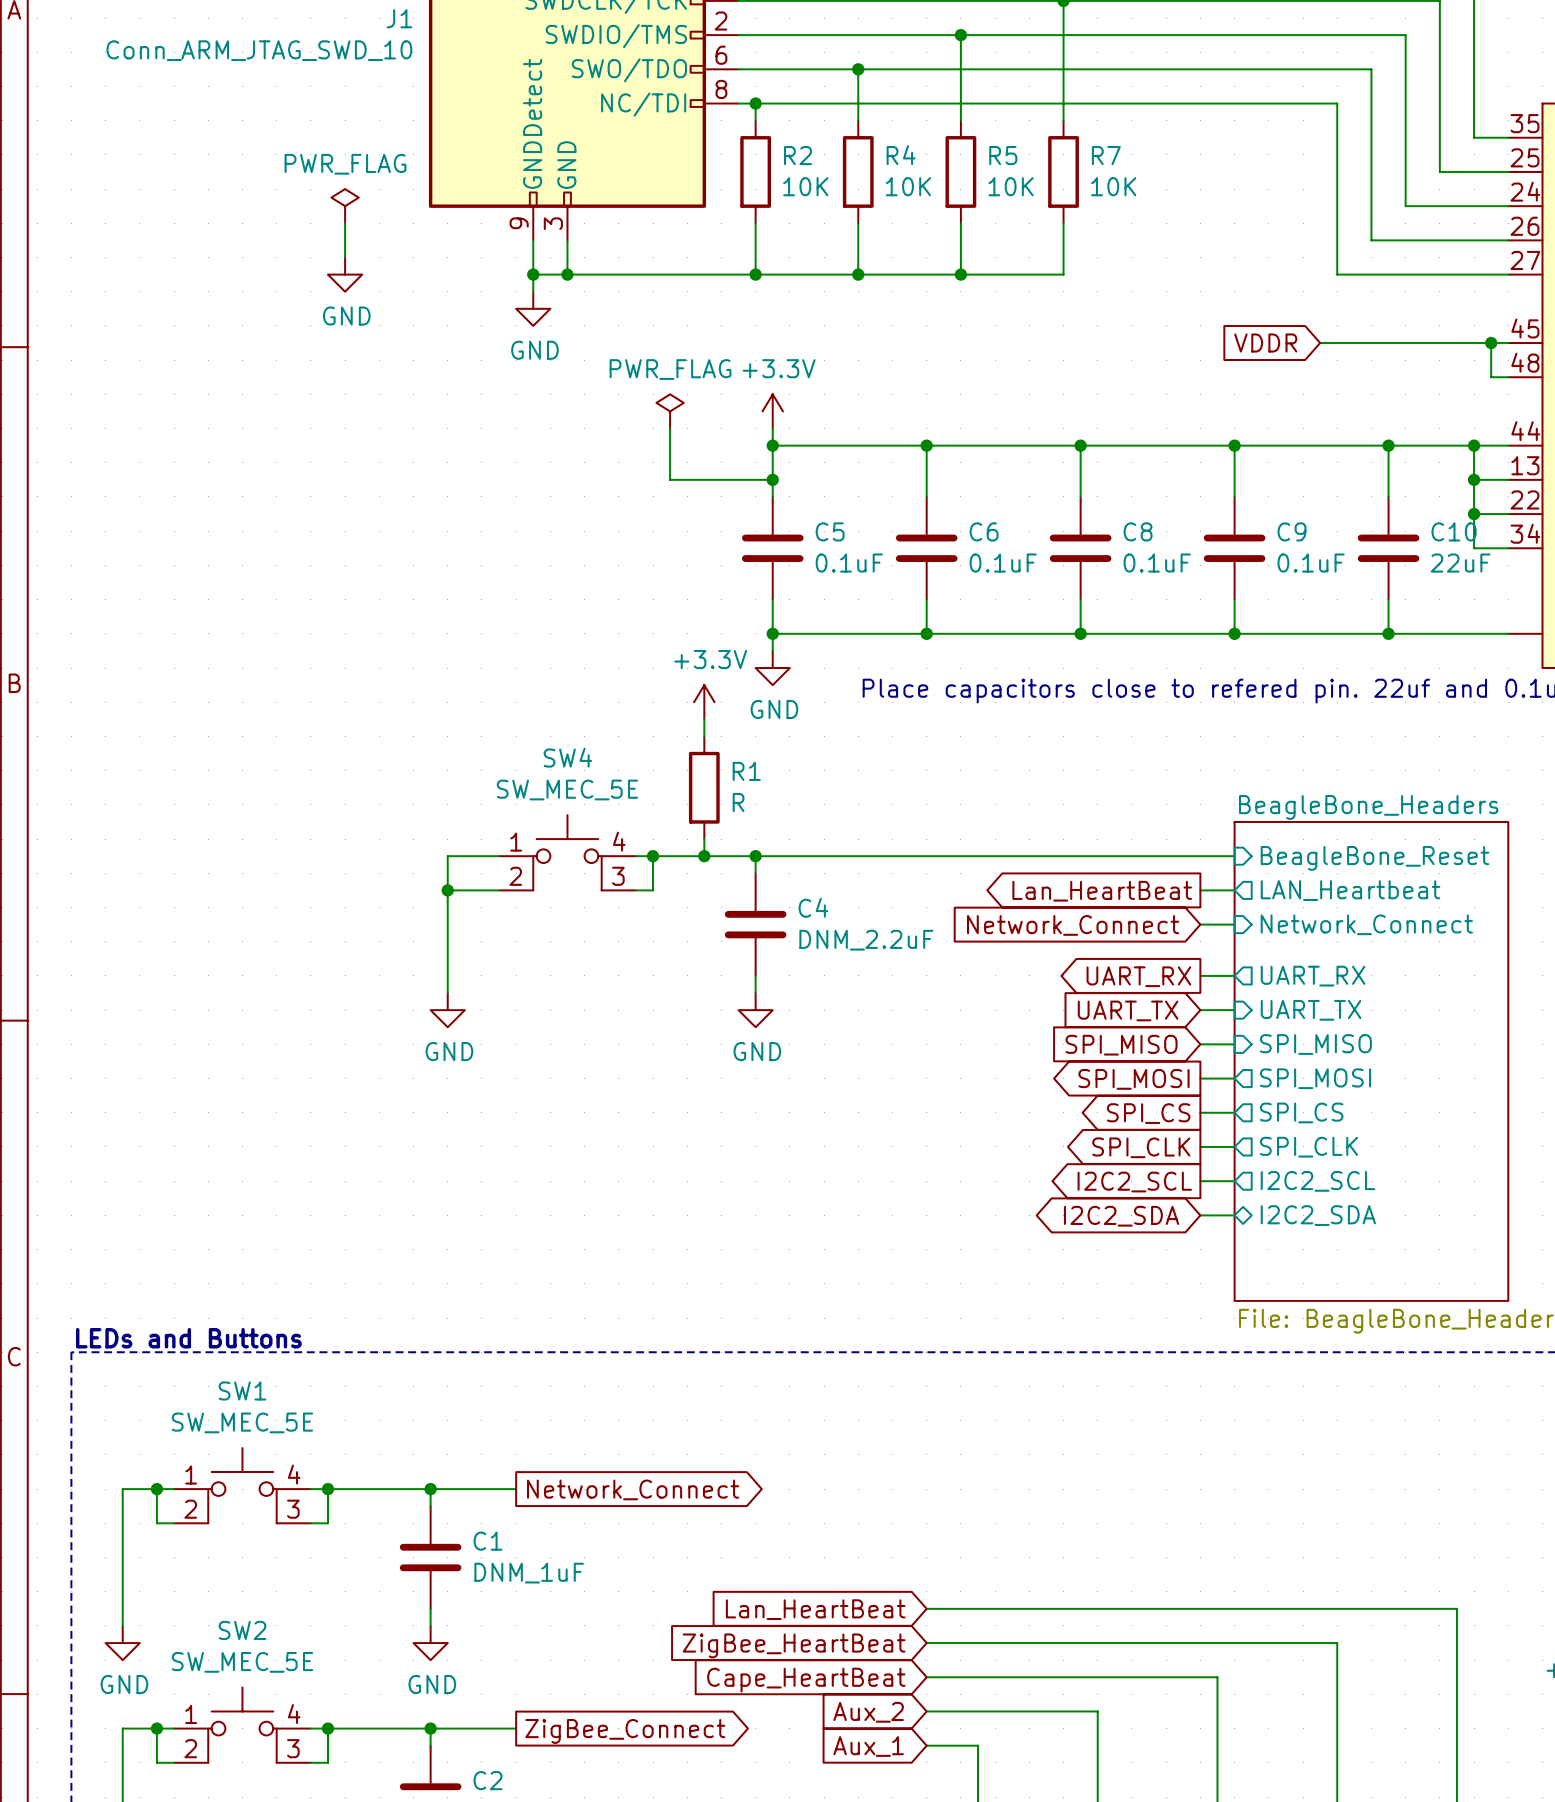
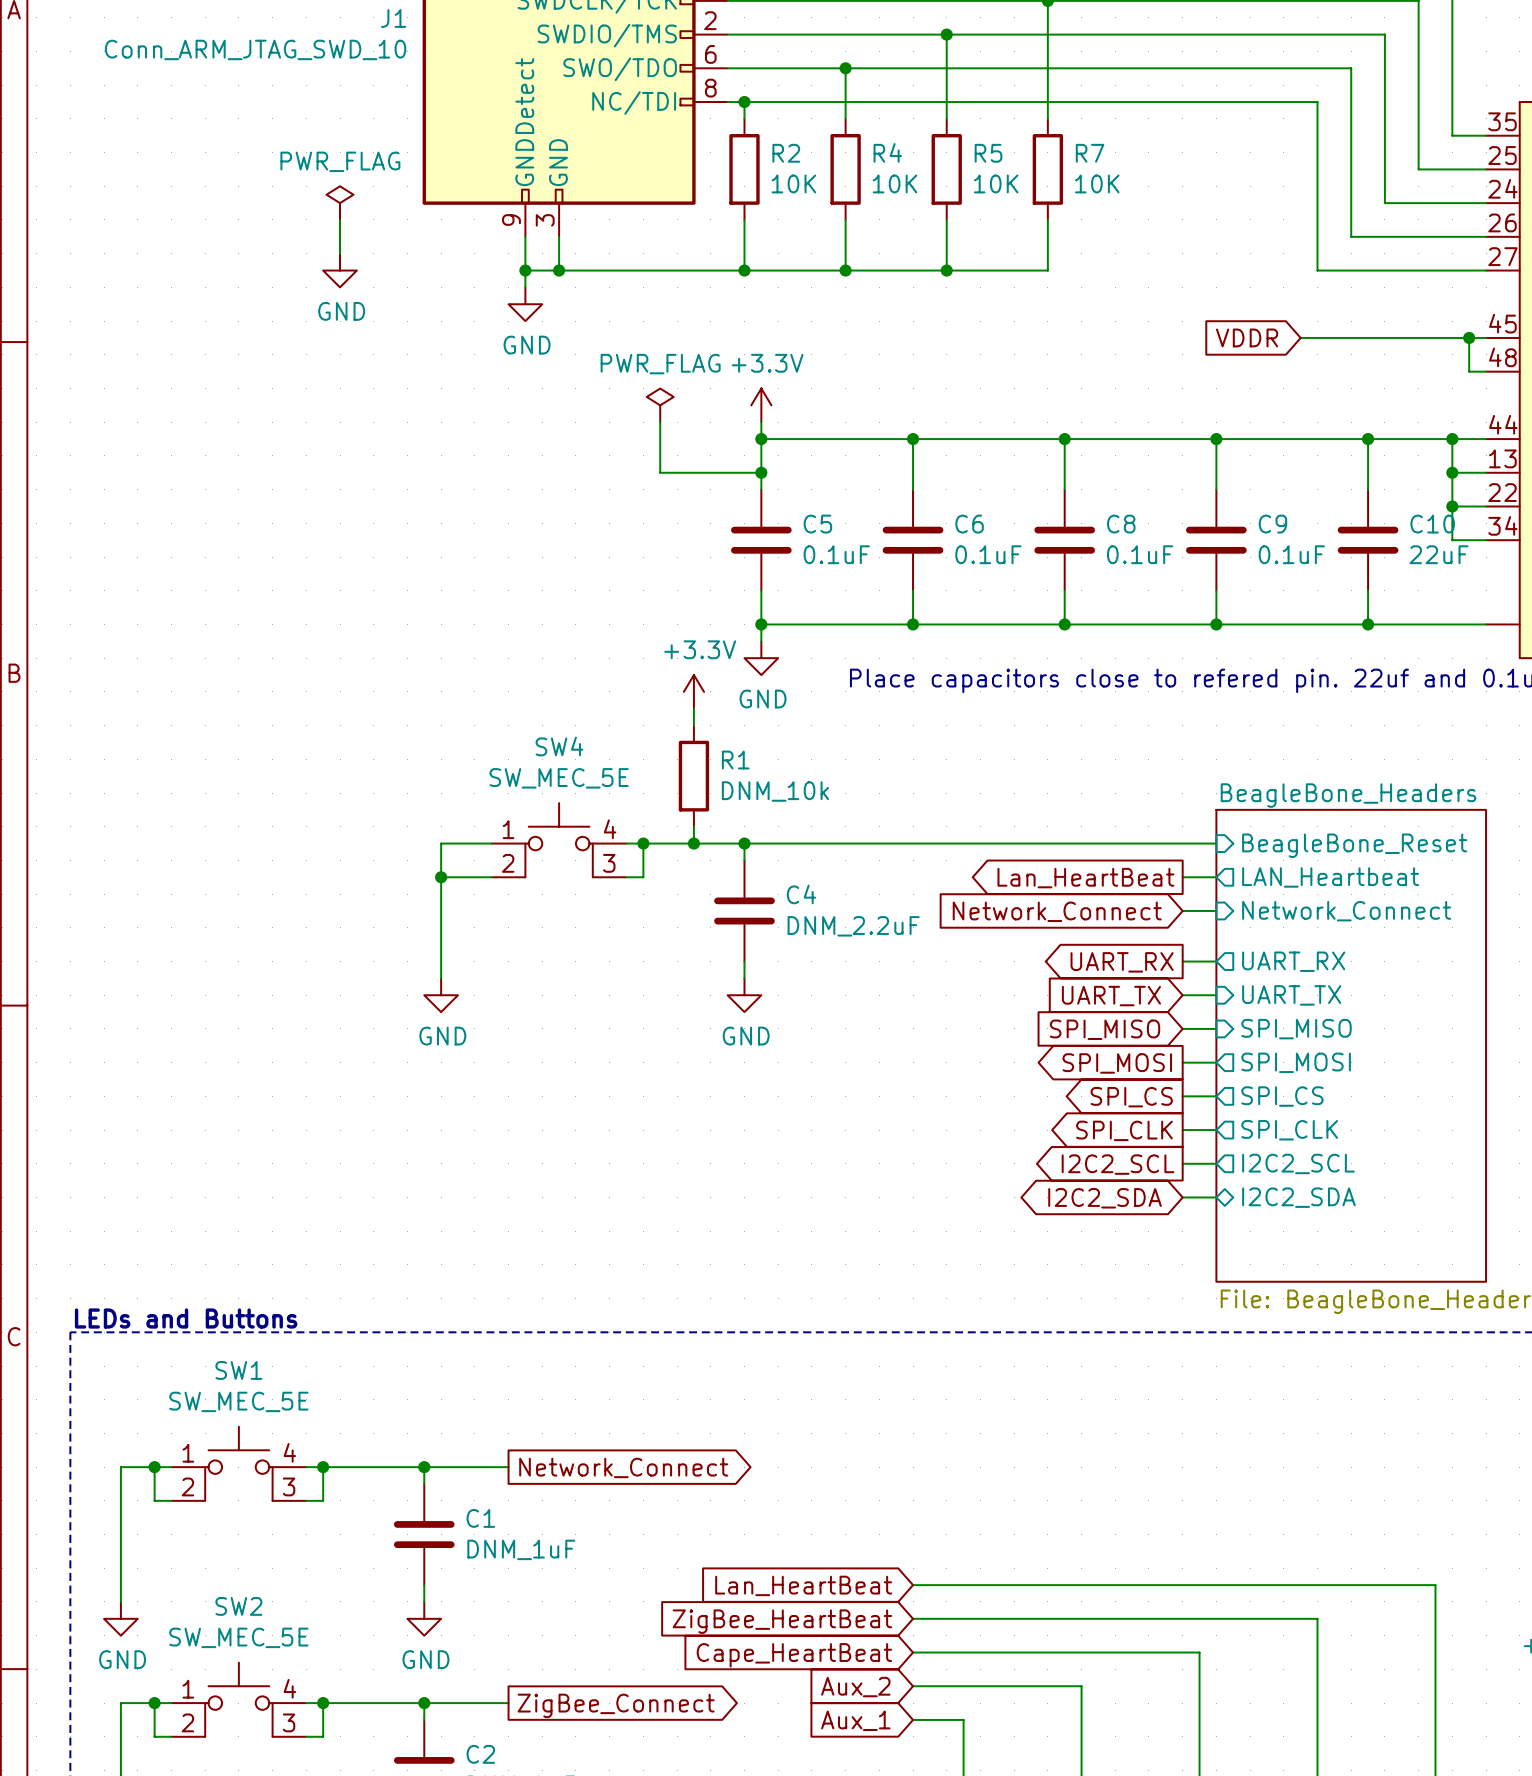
R1 value: R (738, 802) -> DNM_10k (775, 791)

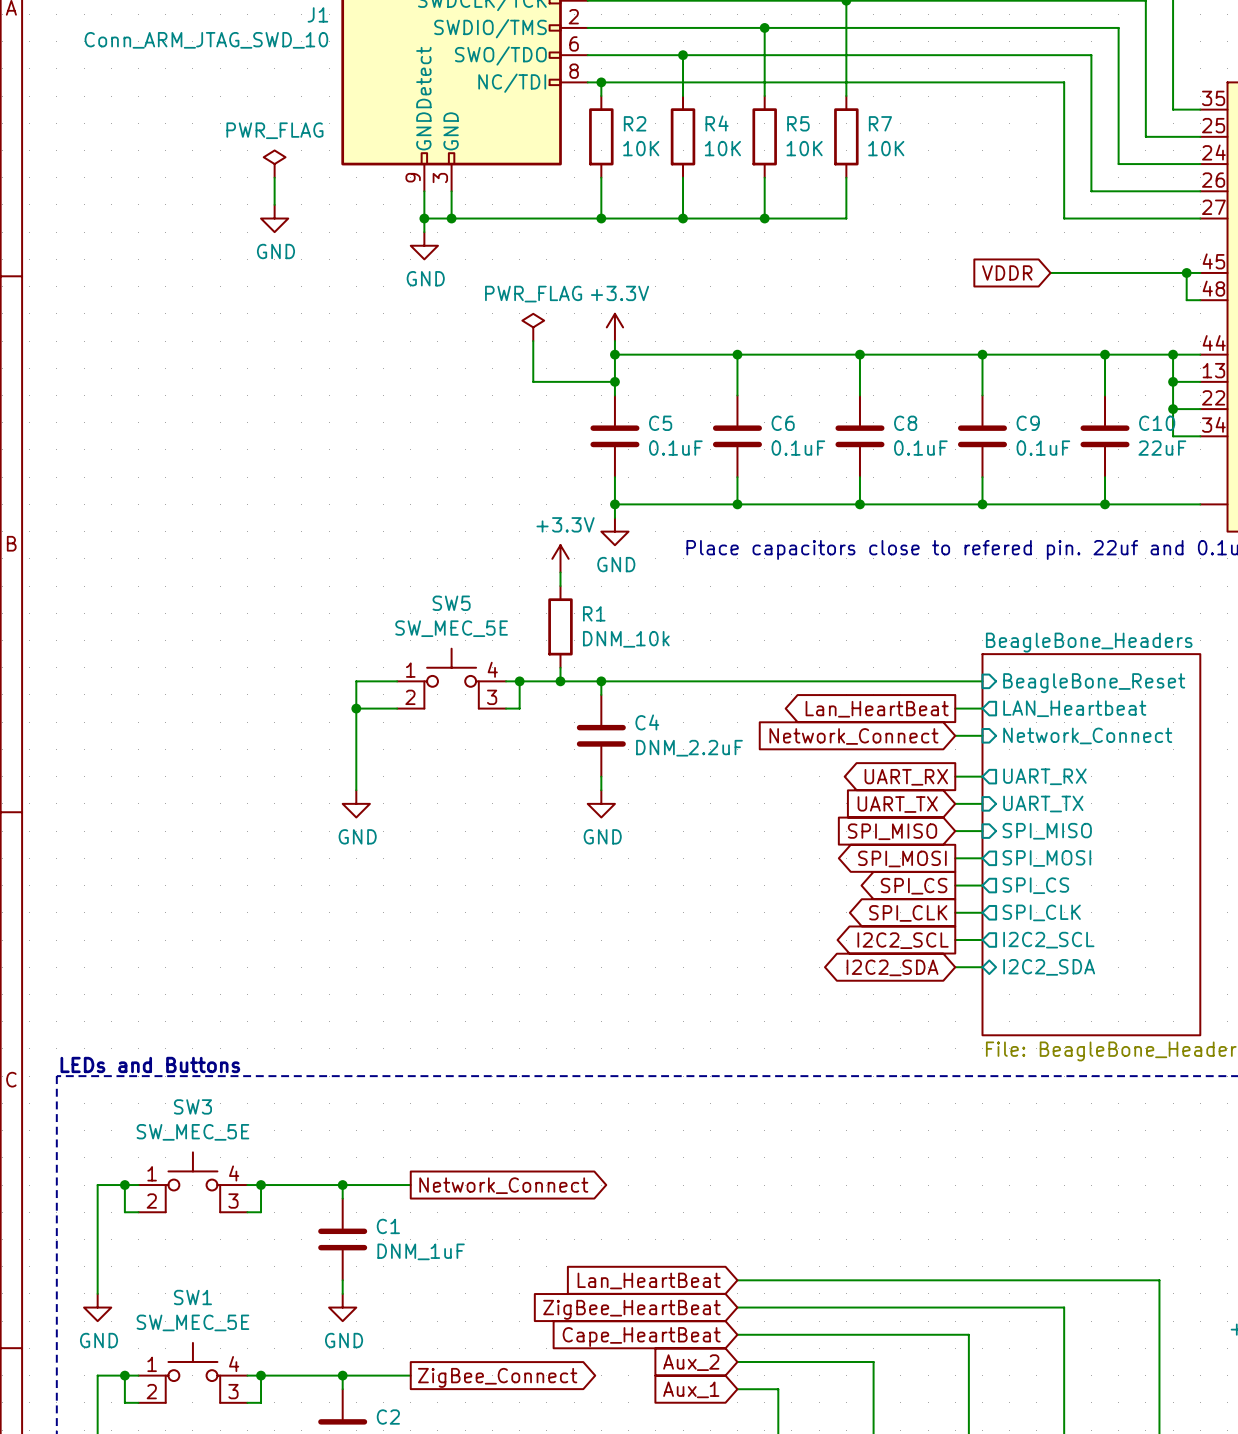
SW4 name: SW4 (559, 746) -> SW5 (451, 603)
SW1 name: SW1 (238, 1370) -> SW3 (192, 1106)
SW2 name: SW2 (238, 1606) -> SW1 (192, 1297)

